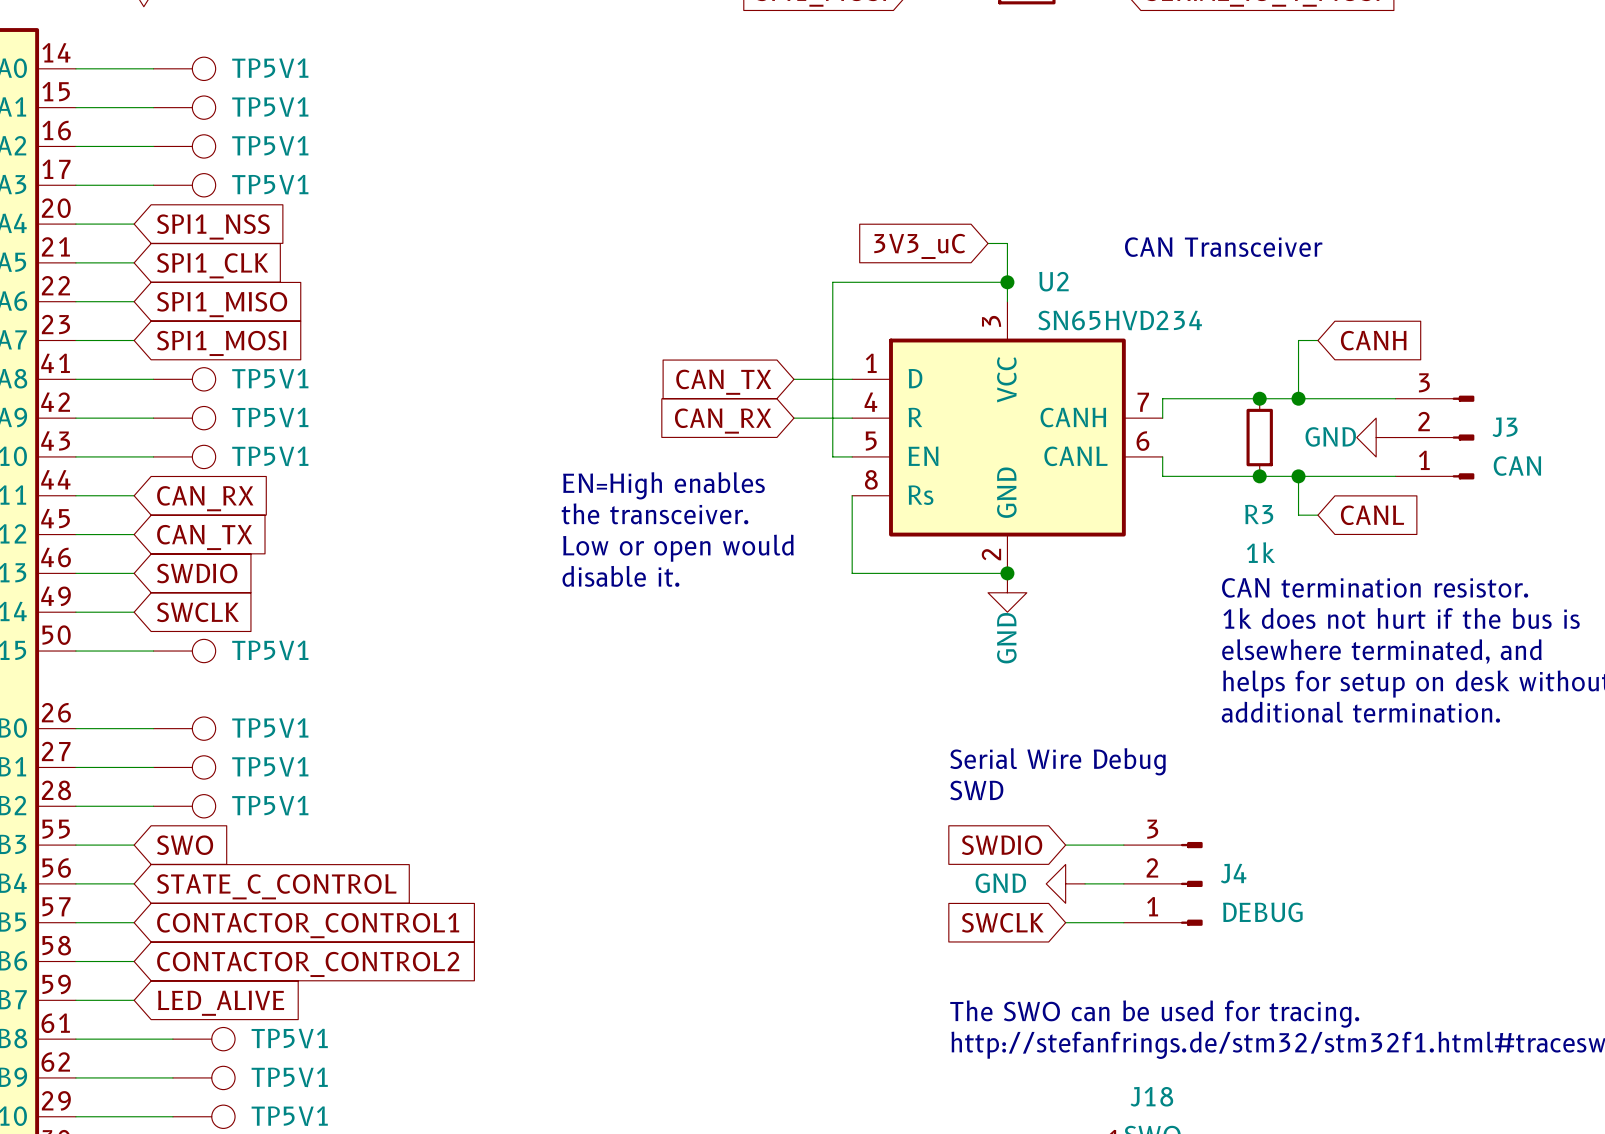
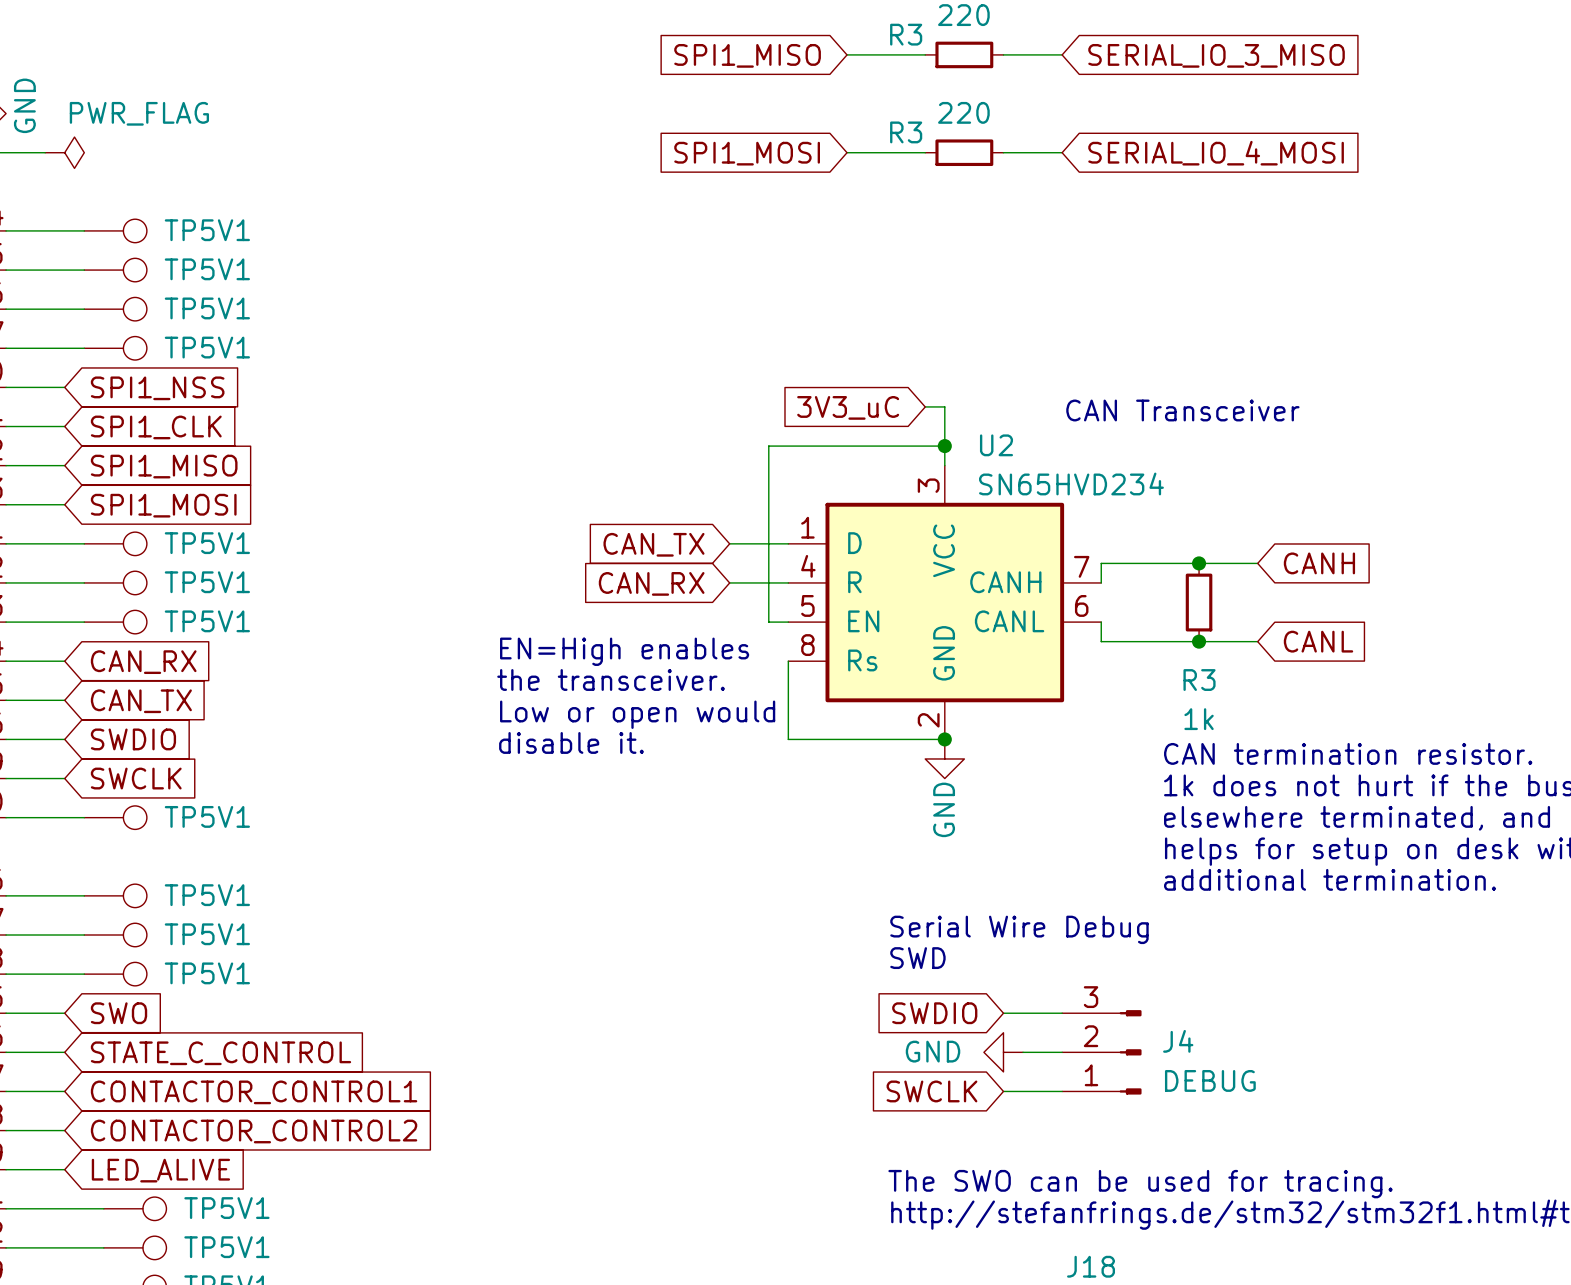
wire: (1317, 340) (1298, 340) (1298, 398) -> none
global label position: CANH (1373, 340) -> CANH (1319, 563)
junction: (1298, 398) -> none
wire: (1317, 398) (1395, 398) -> none
power symbol: GND (1376, 437) -> none
J3: CAN (1434, 437) -> none
wire: (1298, 476) (1298, 515) (1317, 515) -> none
junction: (1298, 476) -> none
wire: (1317, 476) (1395, 476) -> none
global label position: CANL (1372, 515) -> CANL (1318, 641)

